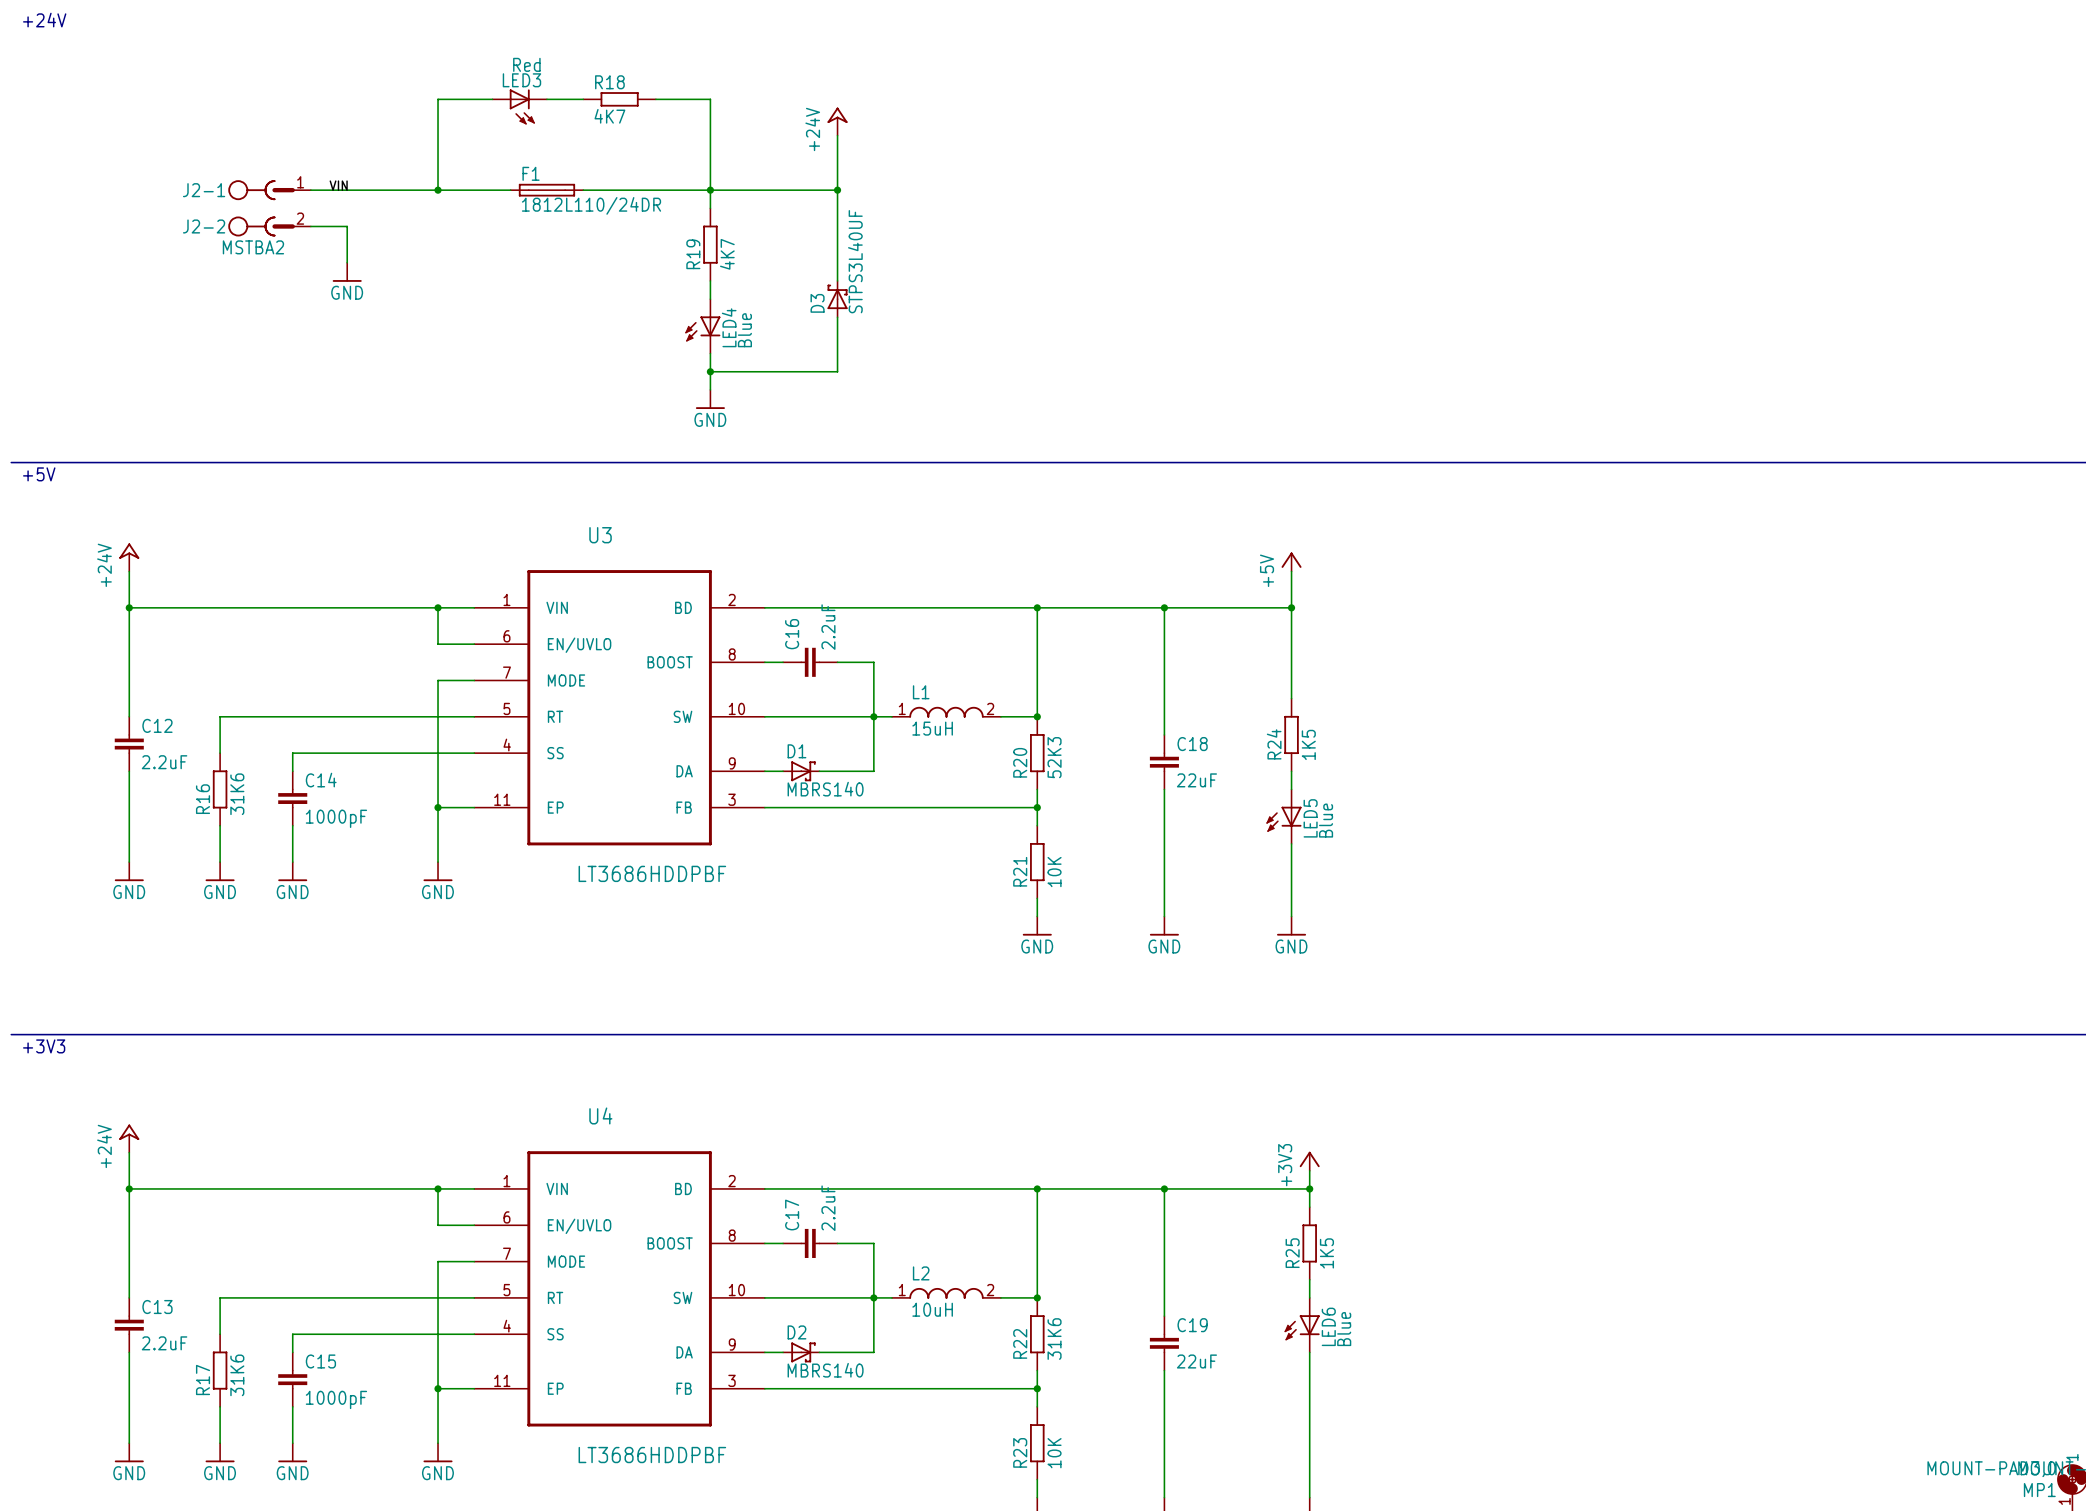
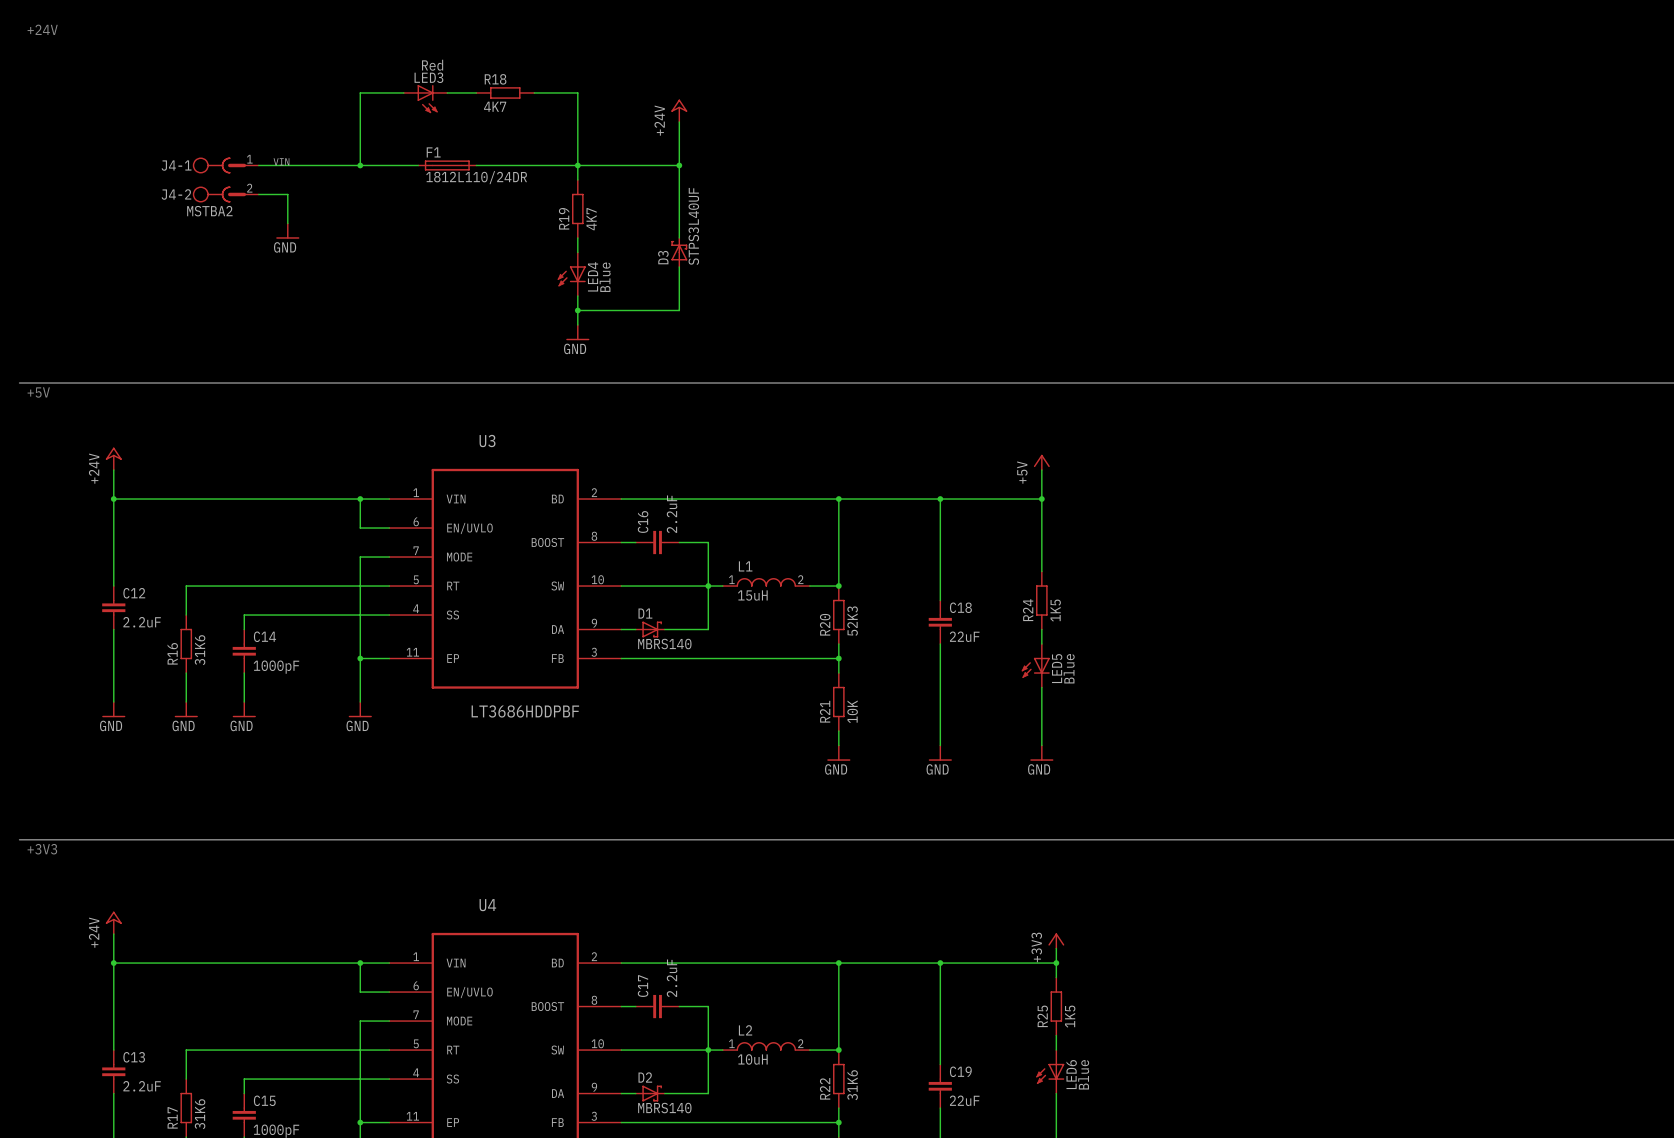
J2-1 name: J2-1 (204, 190) -> J4-1 (176, 165)
J2-2 name: J2-2 (204, 226) -> J4-2 (176, 194)

